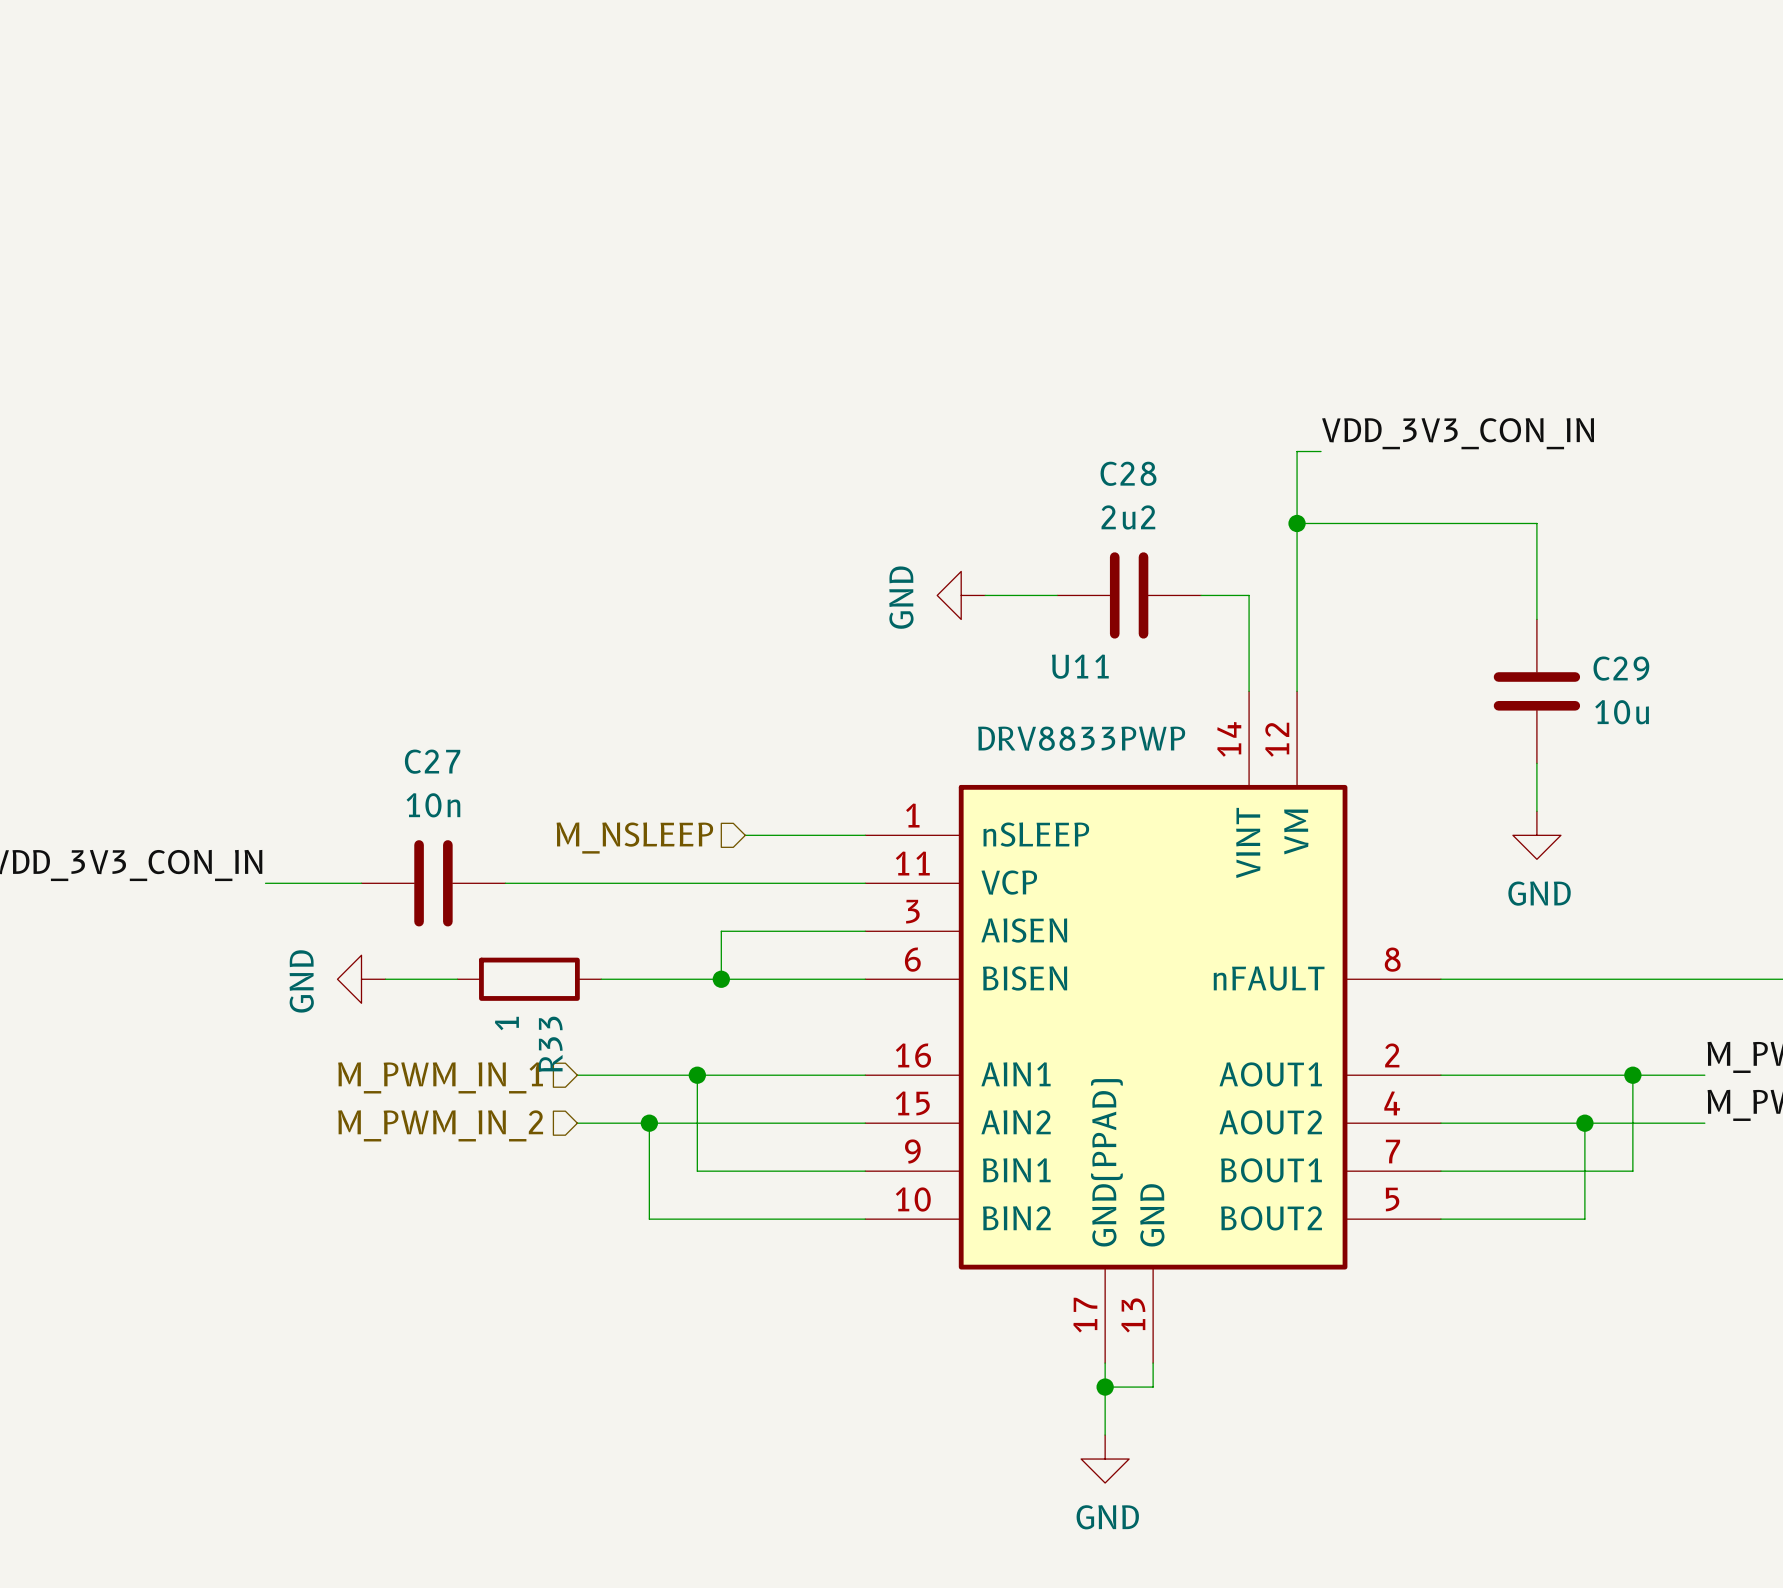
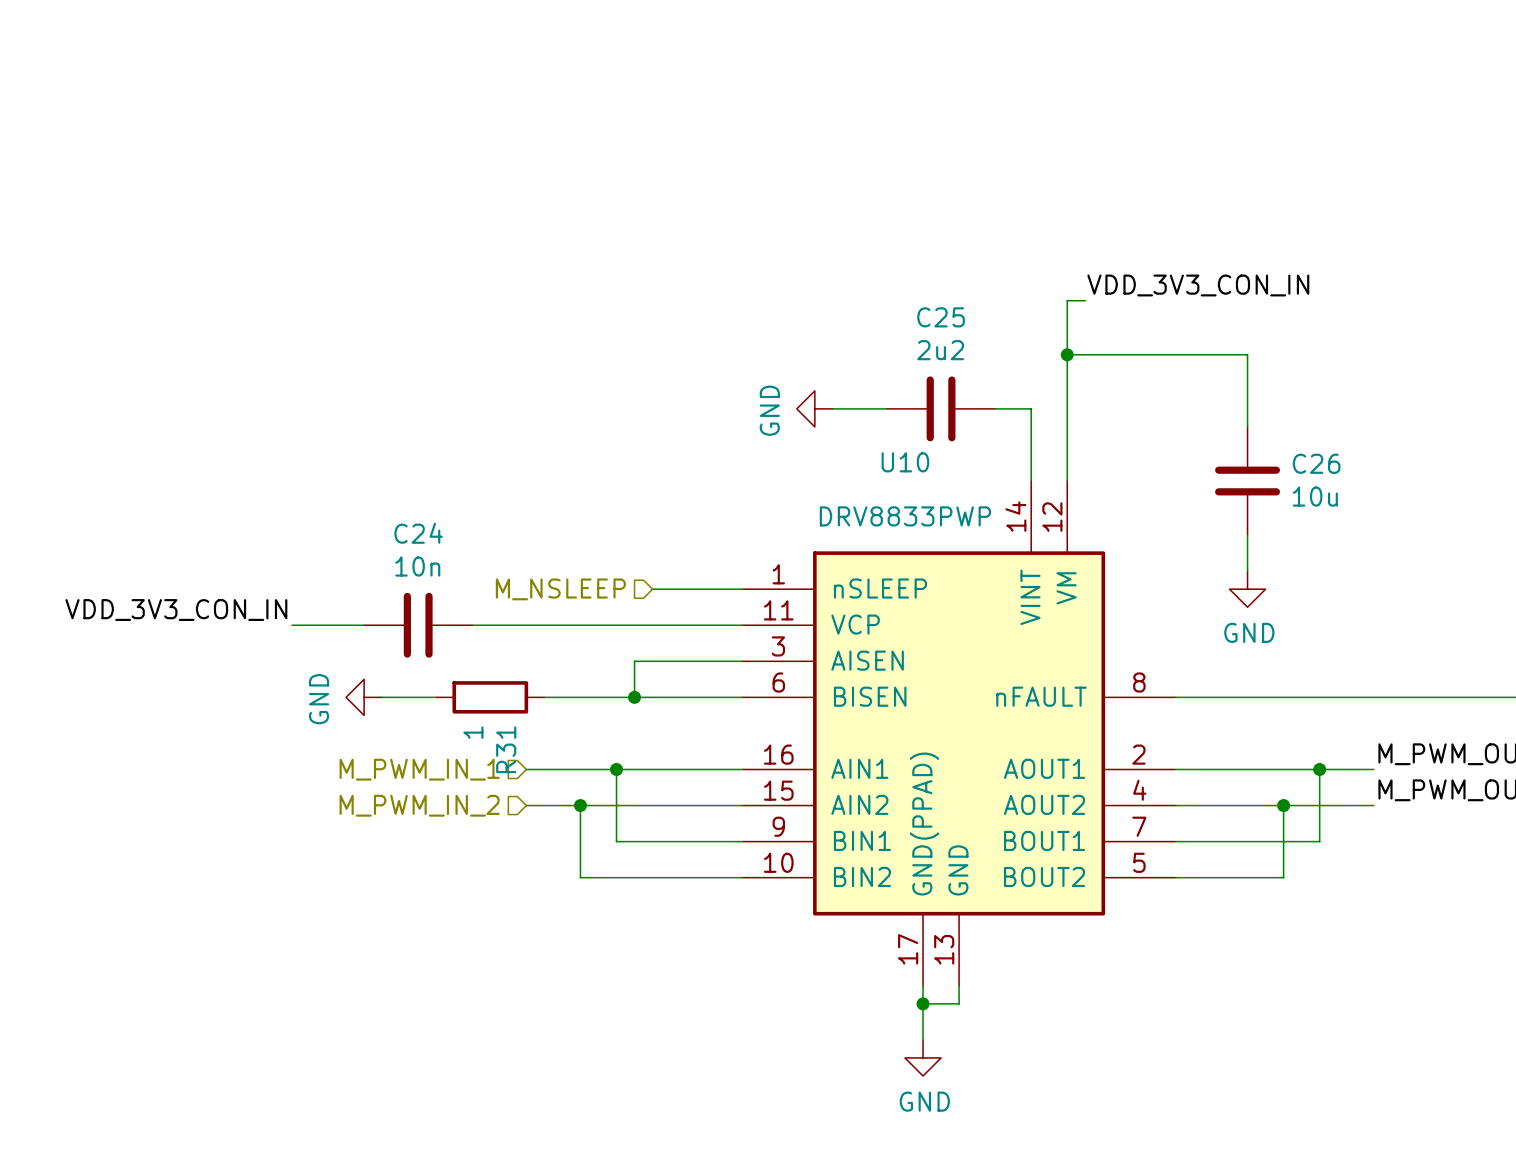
C28 name: C28 (1128, 473) -> C25 (941, 317)
U11 name: U11 (1080, 666) -> U10 (905, 462)
C29 name: C29 (1621, 668) -> C26 (1316, 463)
C27 name: C27 (432, 761) -> C24 (418, 533)
R33 name: R33 (550, 1044) -> R31 (506, 749)

